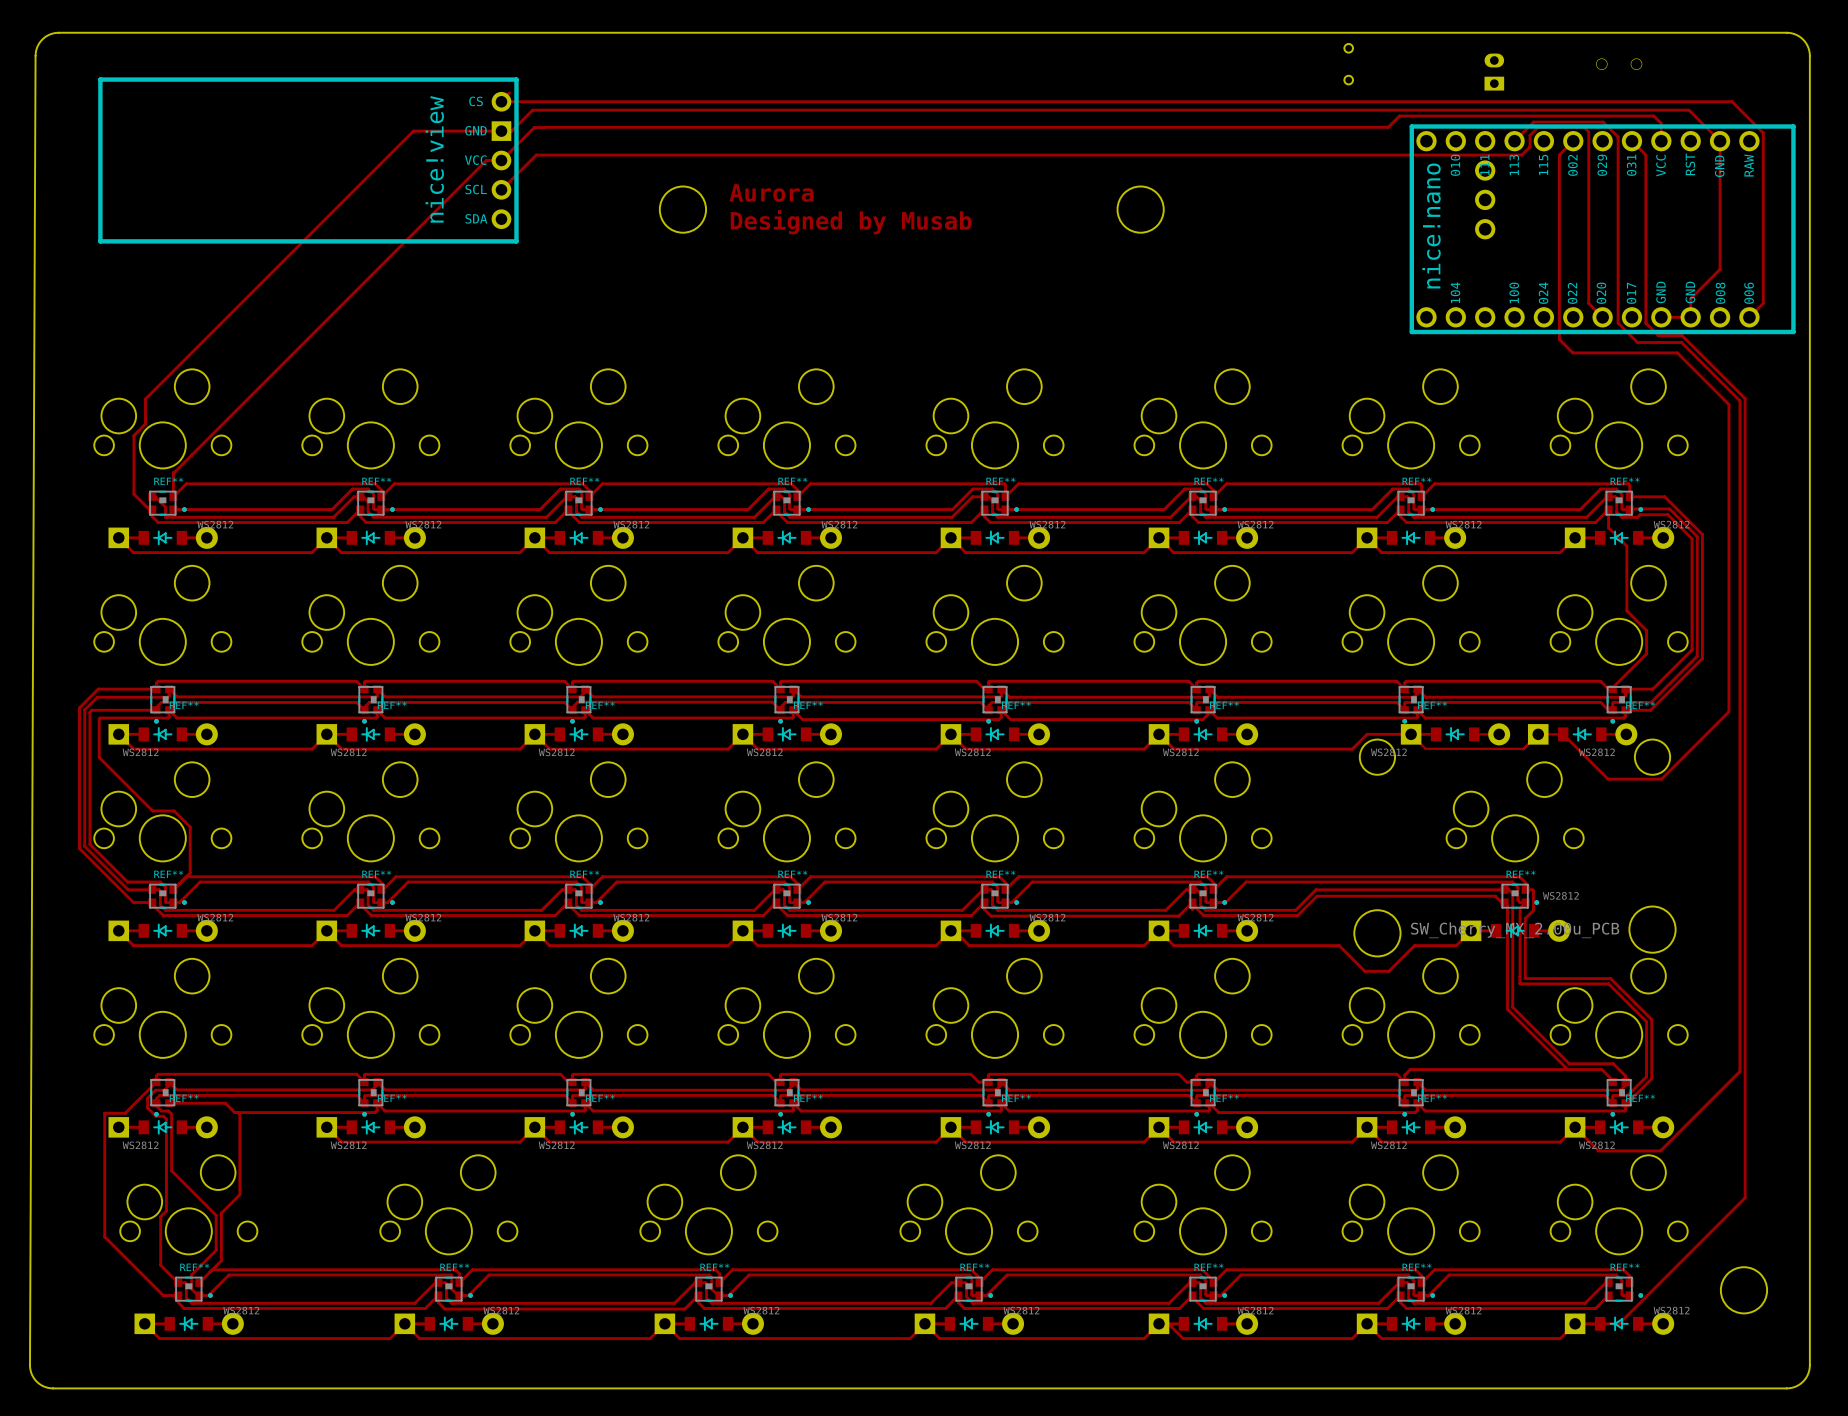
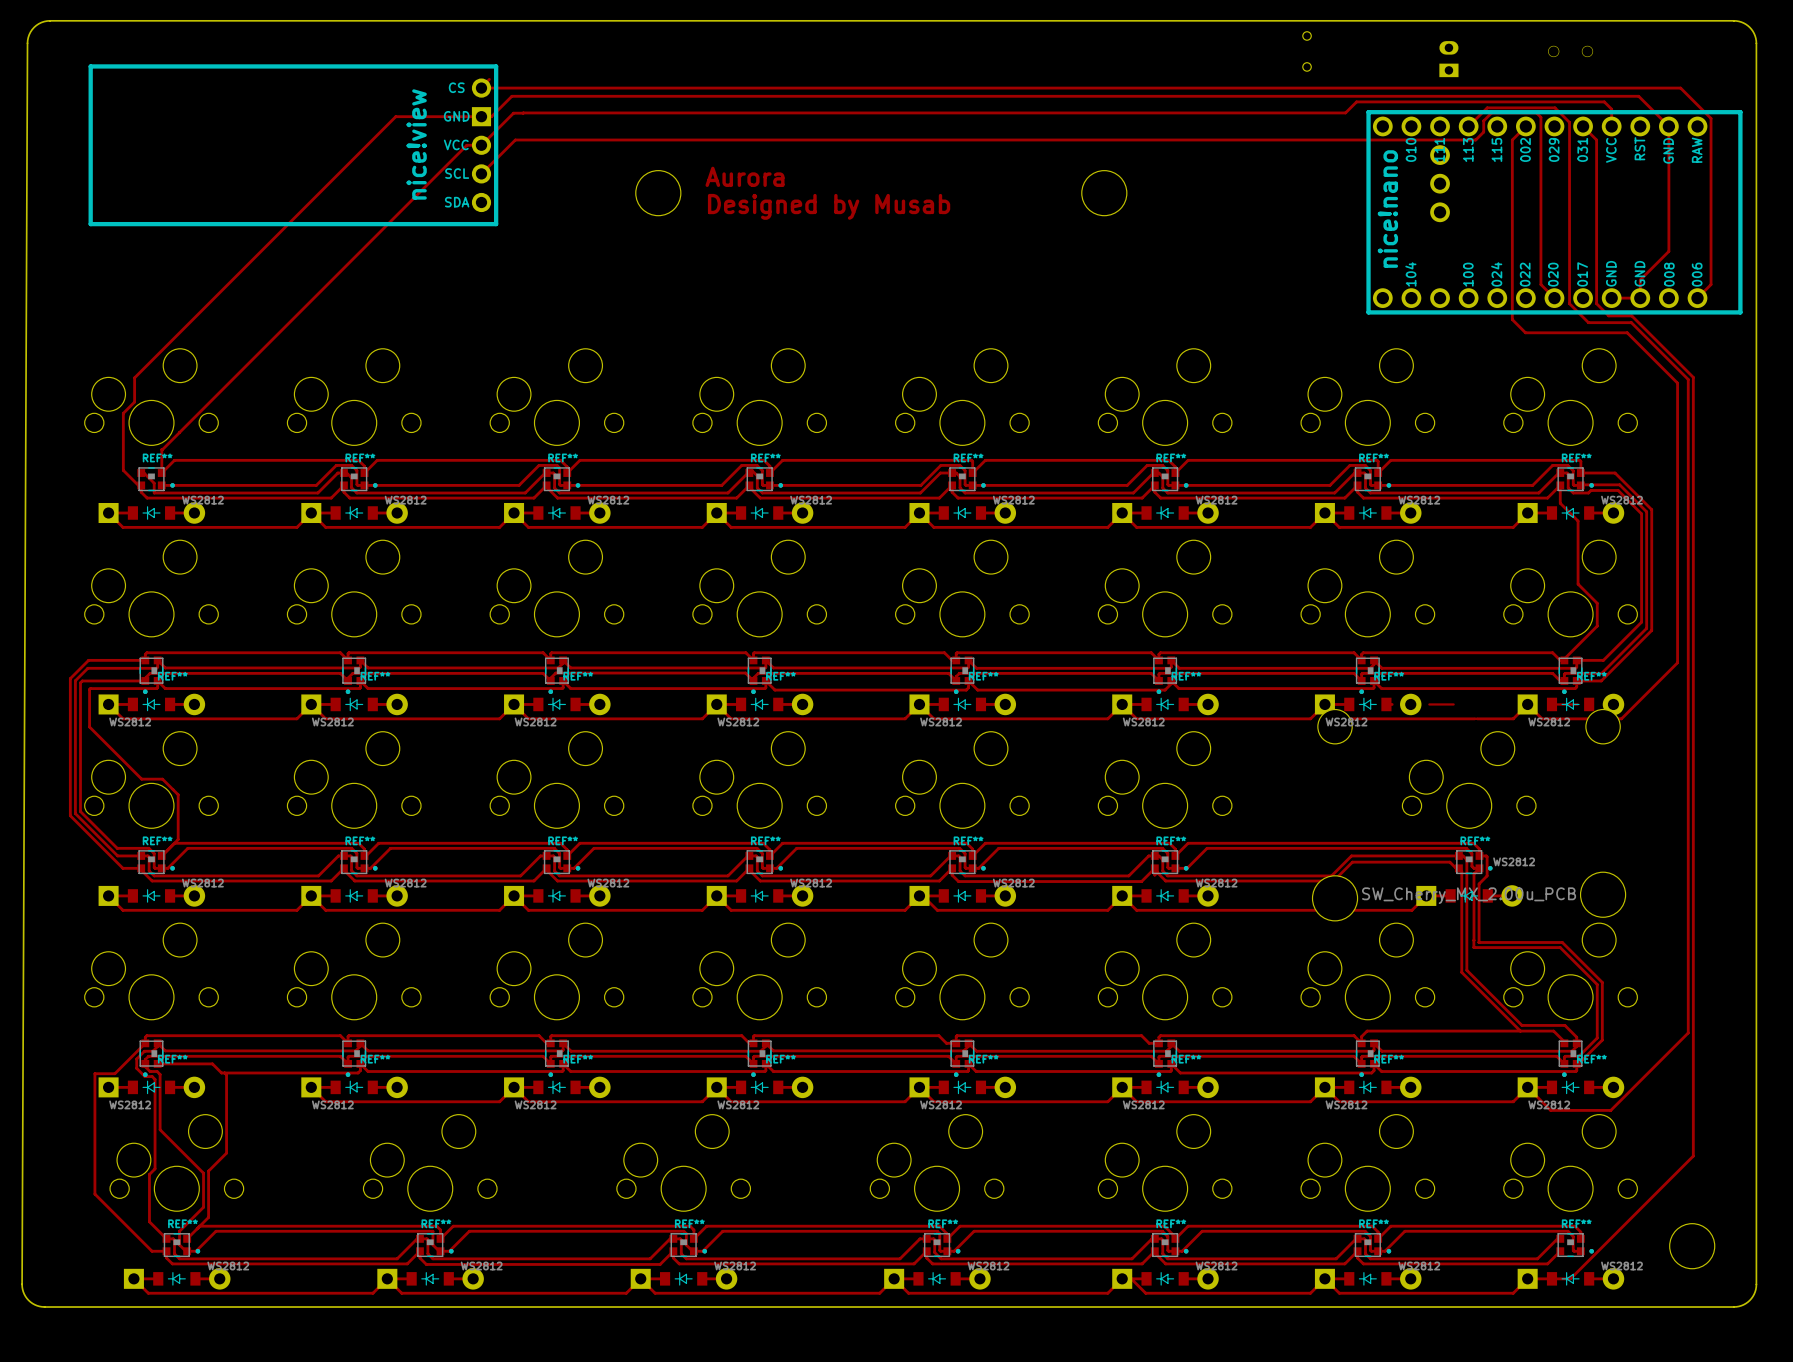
board edge: (35, 55) (29, 1365) (32, 1375) (38, 1383) (53, 1388) (1786, 1388) (1799, 1384) (1808, 1372) (1809, 1329) -> (27, 43) (22, 1284) (24, 1294) (30, 1302) (44, 1307) (1733, 1307) (1743, 1304) (1749, 1300) (1754, 1294) (1756, 1284)
track: (1728, 691) (1728, 711) (1661, 779) (1607, 779) (1563, 734) (1538, 734) (1523, 749) -> (1677, 662) (1621, 718) (1542, 718) (1527, 704) (1513, 718) (1477, 718)
track: none -> (1324, 704) (1339, 718) (1474, 718)
track: (1392, 734) (1430, 734) -> none
track: (1411, 734) (1425, 748) (1523, 748) -> none
part position: (1455, 734) -> (1368, 704)
part position: (1582, 734) -> (1570, 704)
track: (1394, 889) (1316, 889) (1295, 910) -> (1351, 855) (1331, 875) (1255, 875)
track: (1395, 896) (1317, 896) (1297, 915) -> (1352, 862) (1333, 881) (1257, 881)
track: (1339, 945) (1364, 971) (1388, 971) (1414, 945) -> (1297, 910) (1371, 910)

